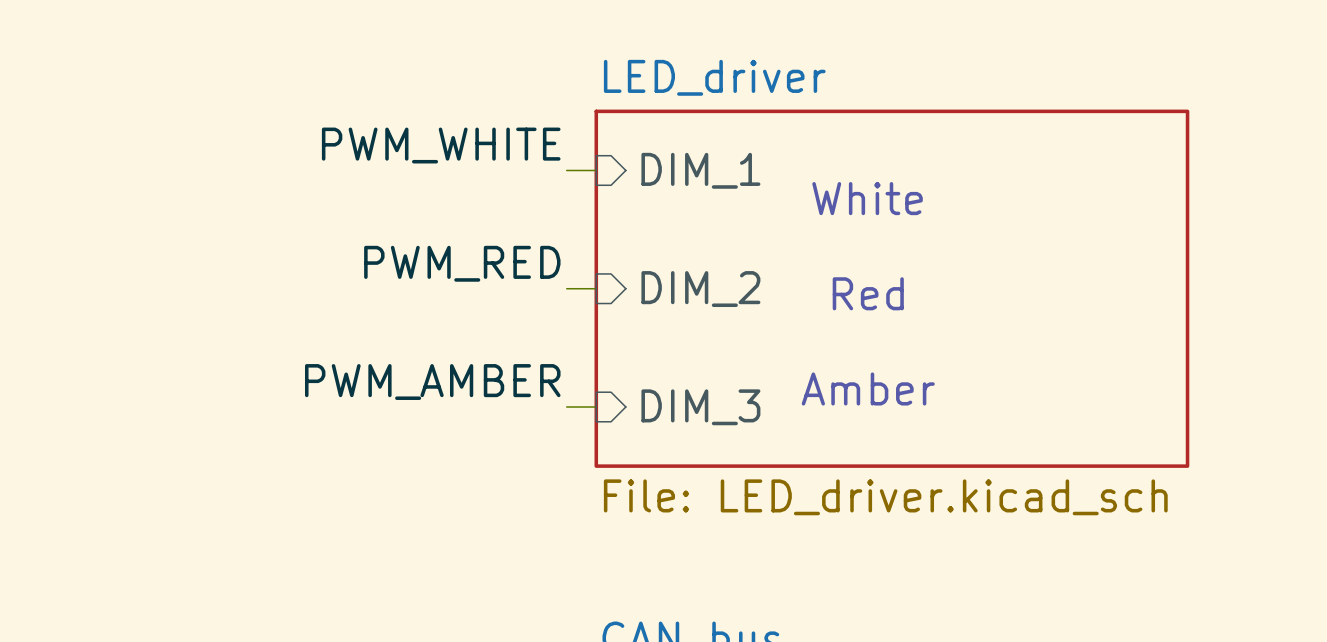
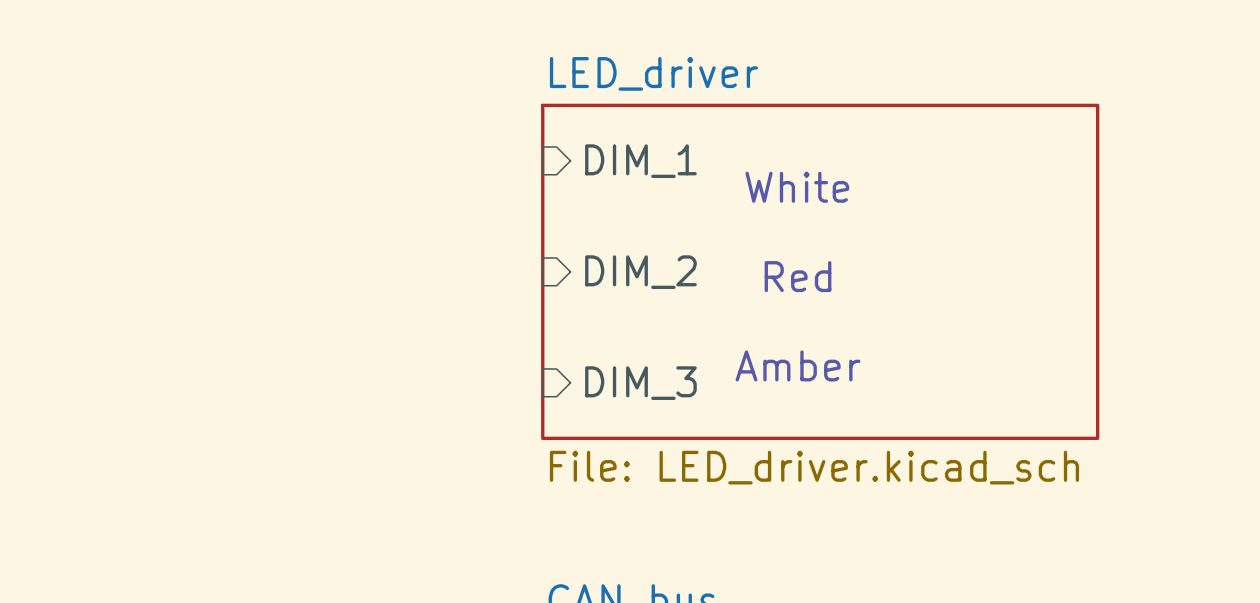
label: PWM_WHITE (441, 145) -> none
wire: (566, 170) (596, 170) -> none
label: PWM_RED (462, 263) -> none
wire: (566, 288) (596, 288) -> none
label: PWM_AMBER (432, 382) -> none
wire: (566, 406) (596, 406) -> none

